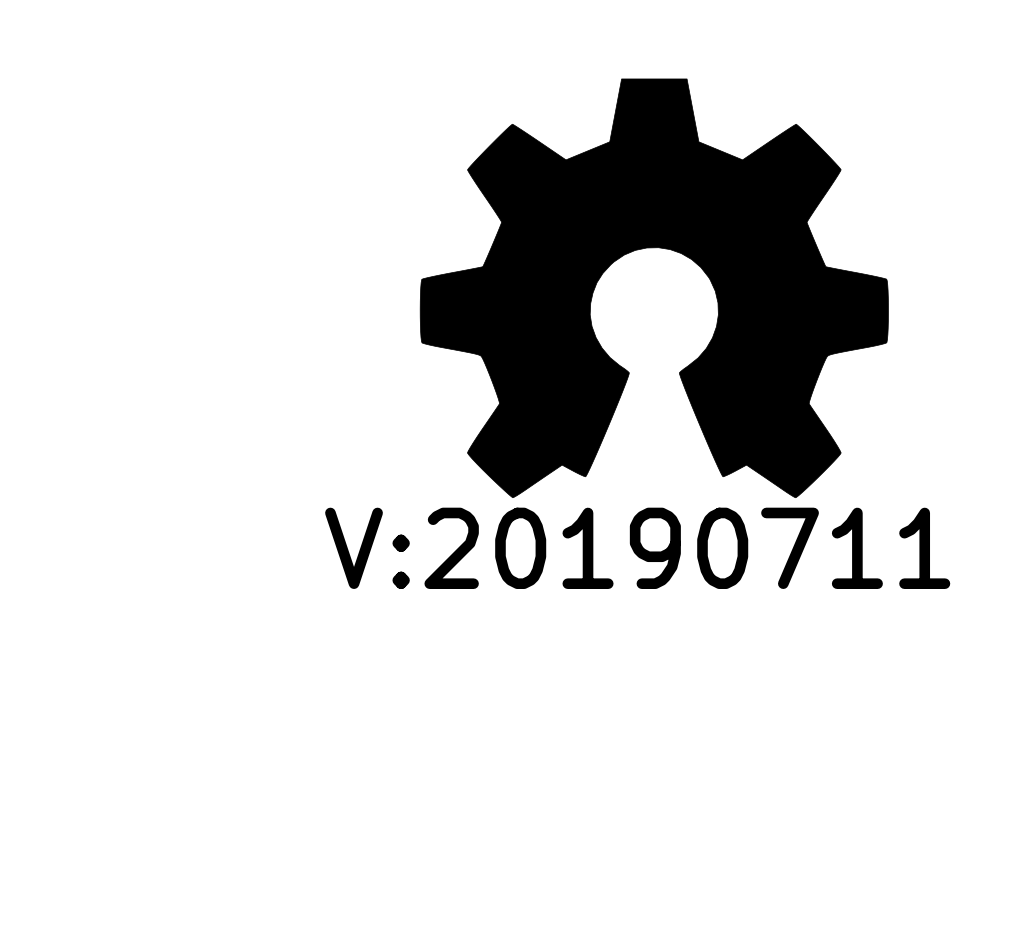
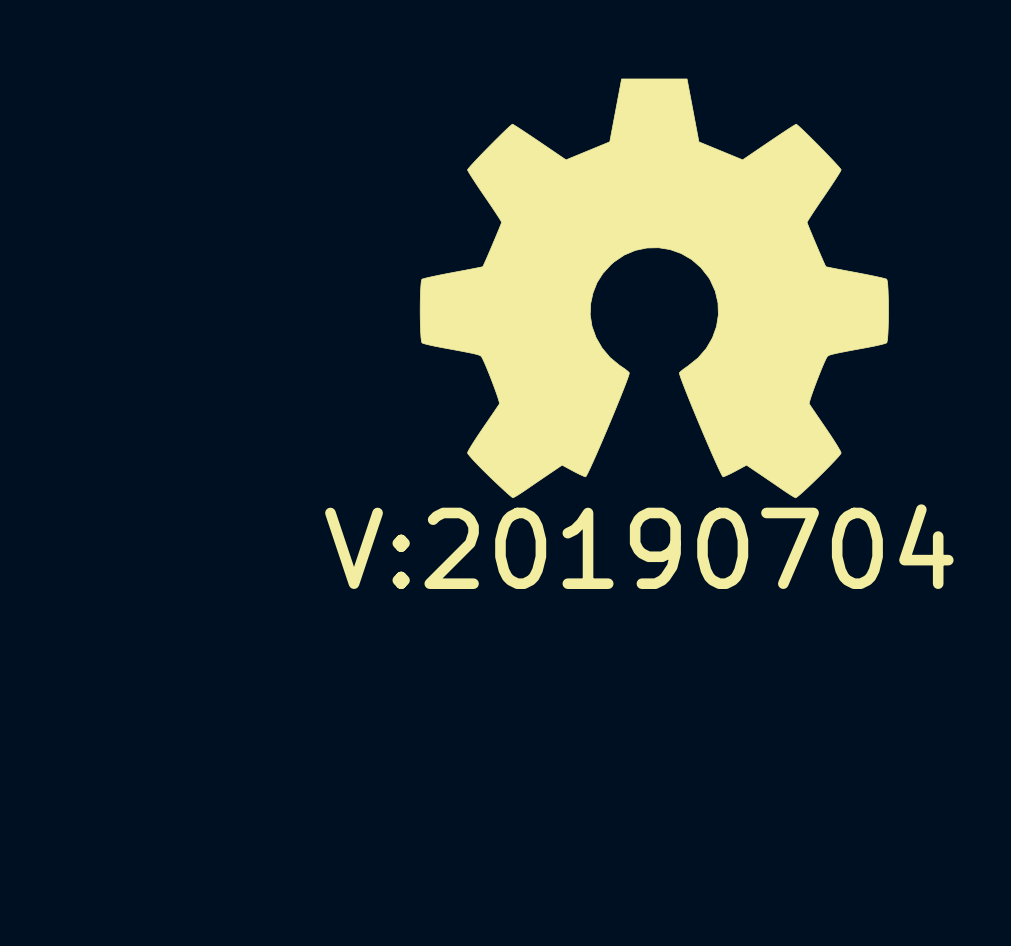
drawing shape: [325, 507, 951, 589] -> [325, 504, 954, 589]

